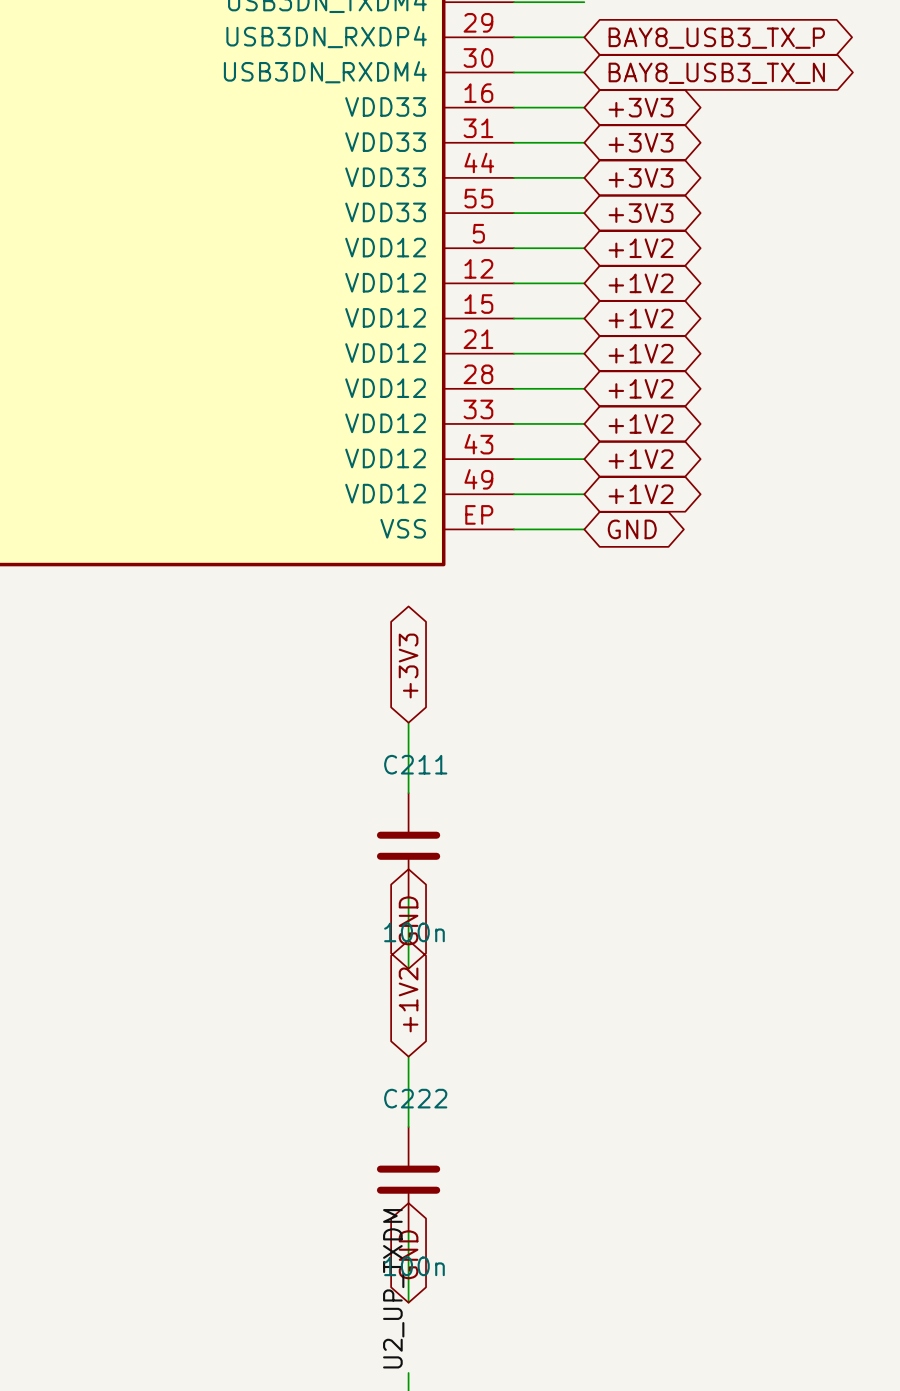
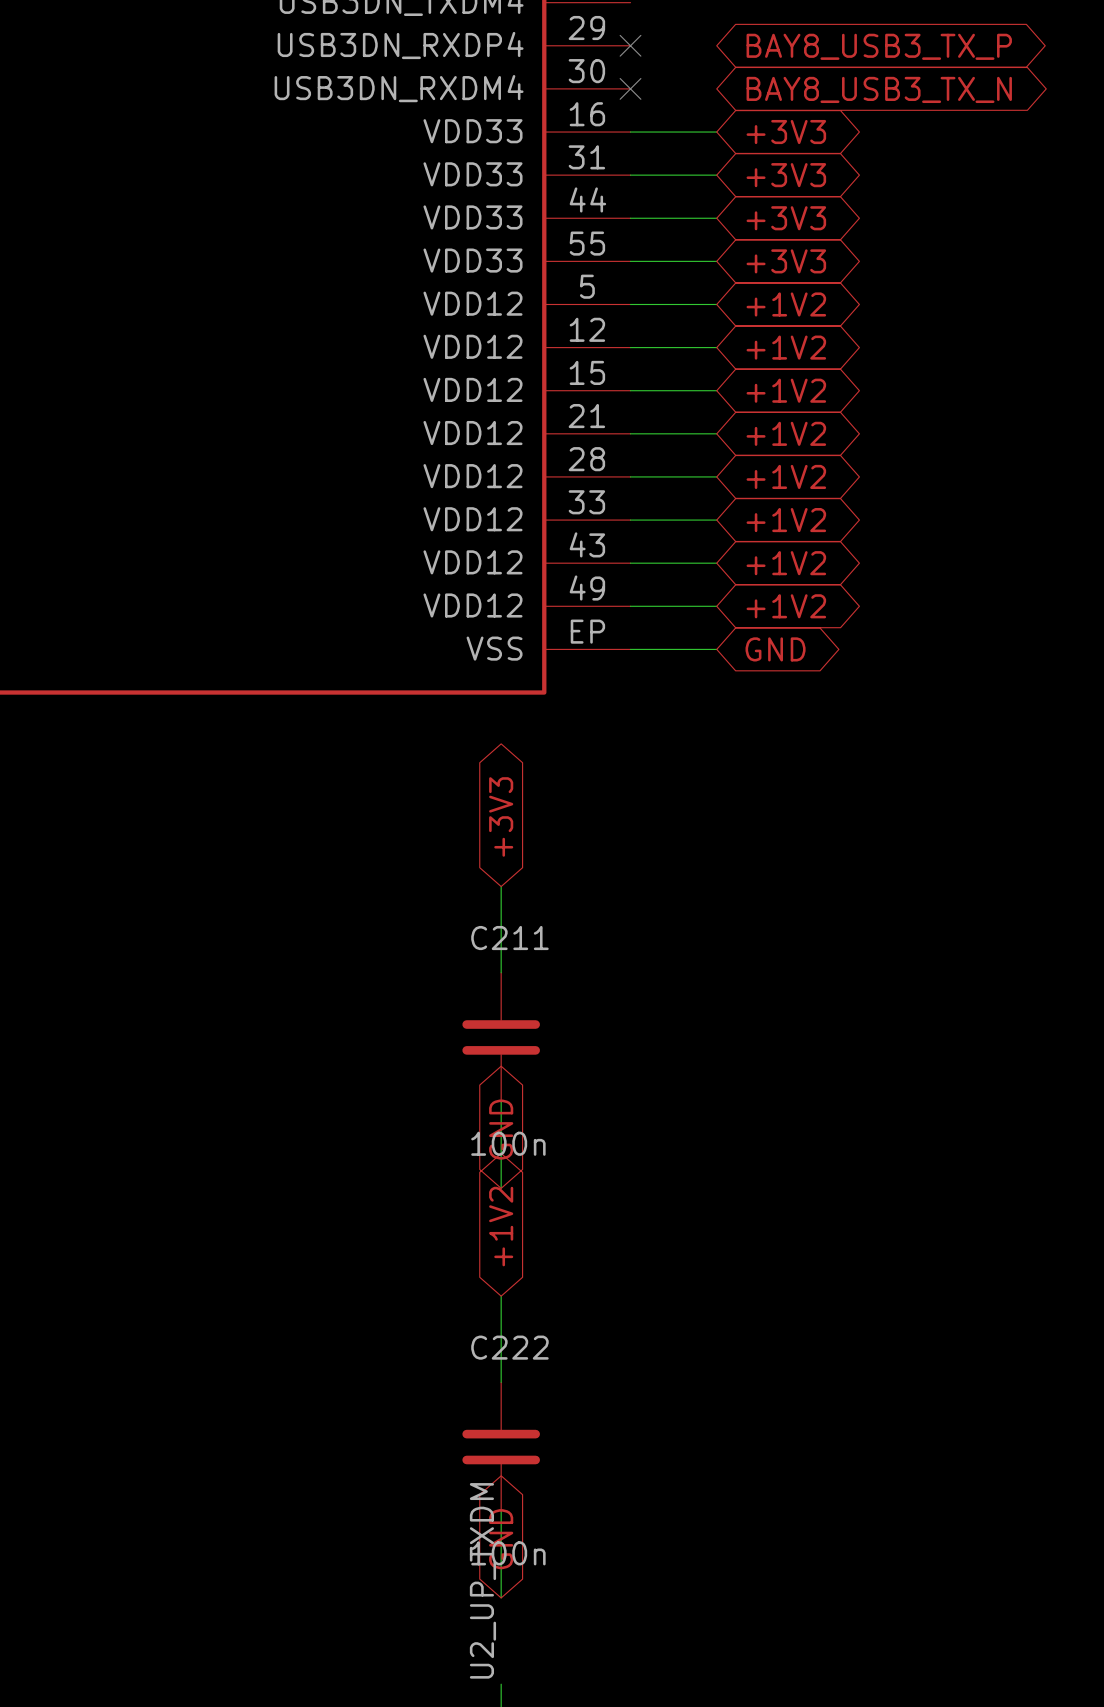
wire: (514, 2) (584, 2) -> none
wire: (514, 37) (584, 37) -> none
no-connect mark: none -> (630, 45)
wire: (514, 72) (584, 72) -> none
no-connect mark: none -> (630, 88)

